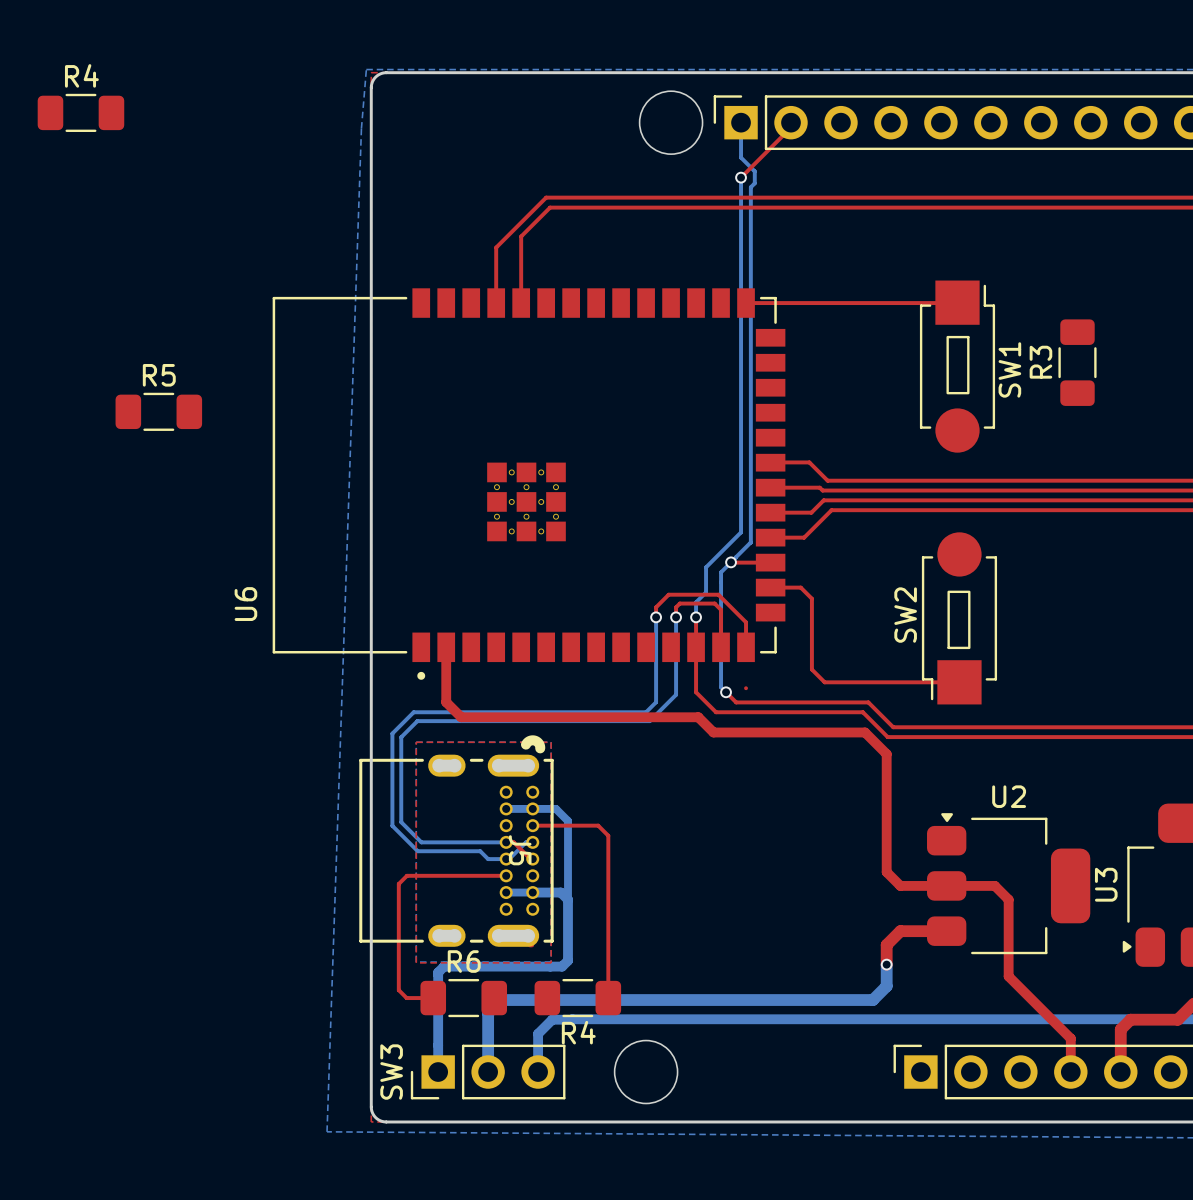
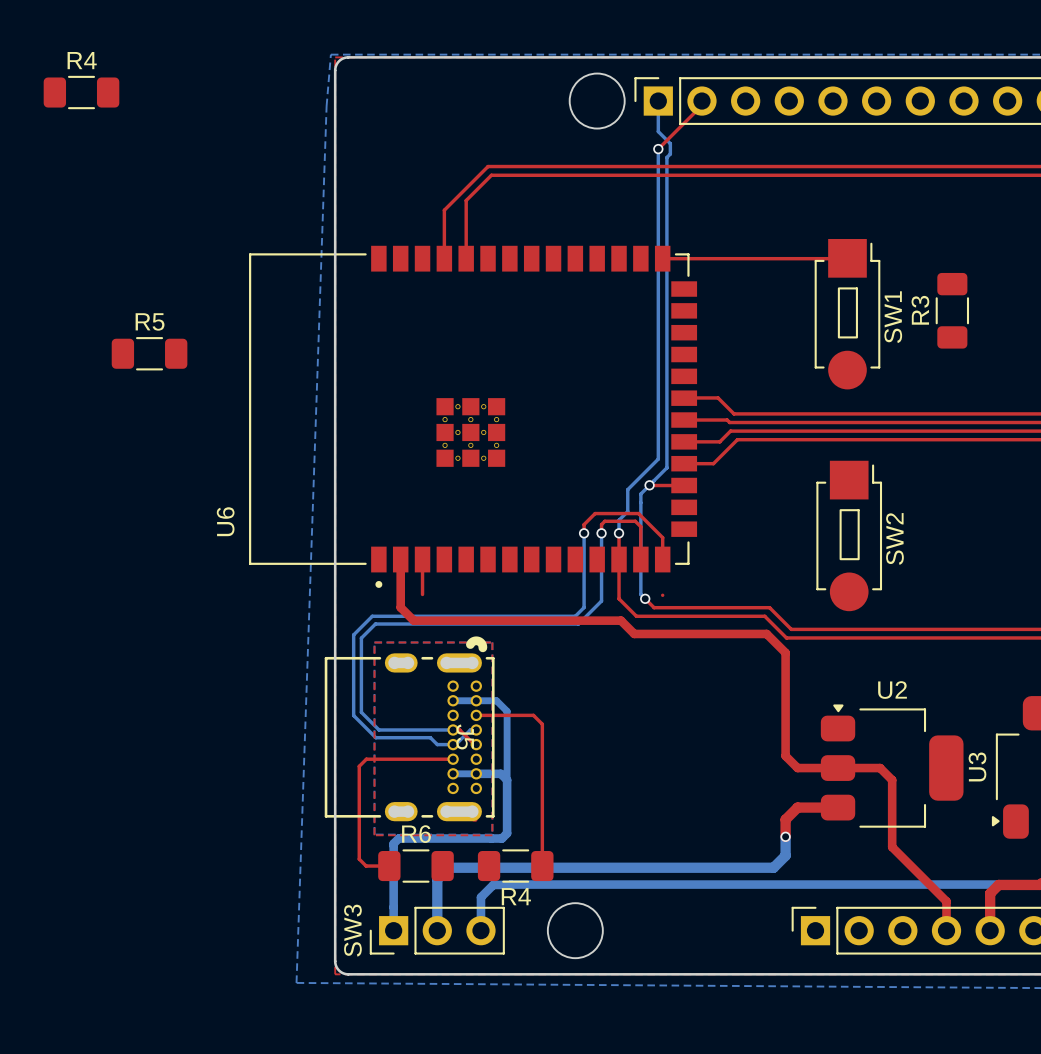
top track: (770, 587) (800, 587) (811, 598) (811, 669) (824, 682) (959, 682) -> none
SW2 rotation: 0° (959, 618) -> 180° (849, 535)
top track: none -> (422, 559) (422, 594)

